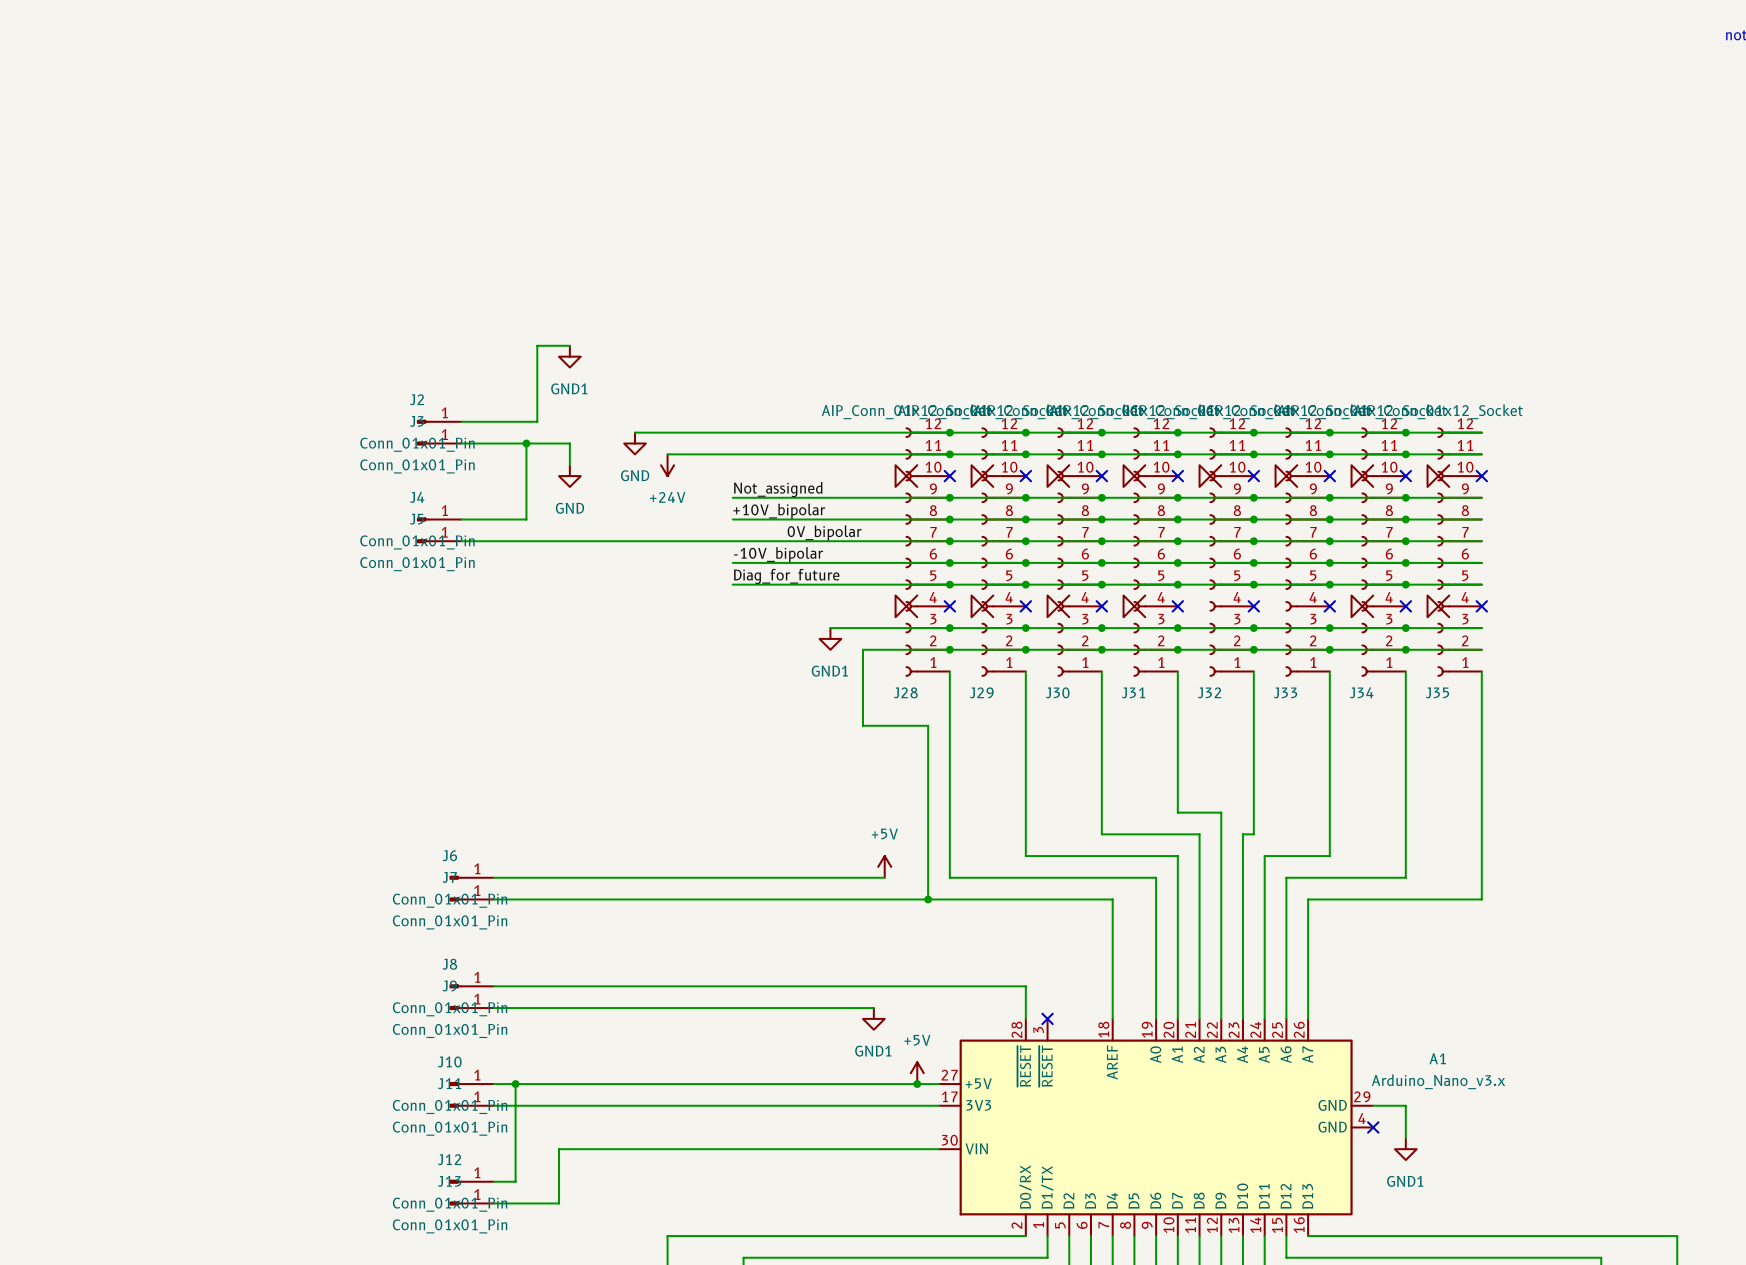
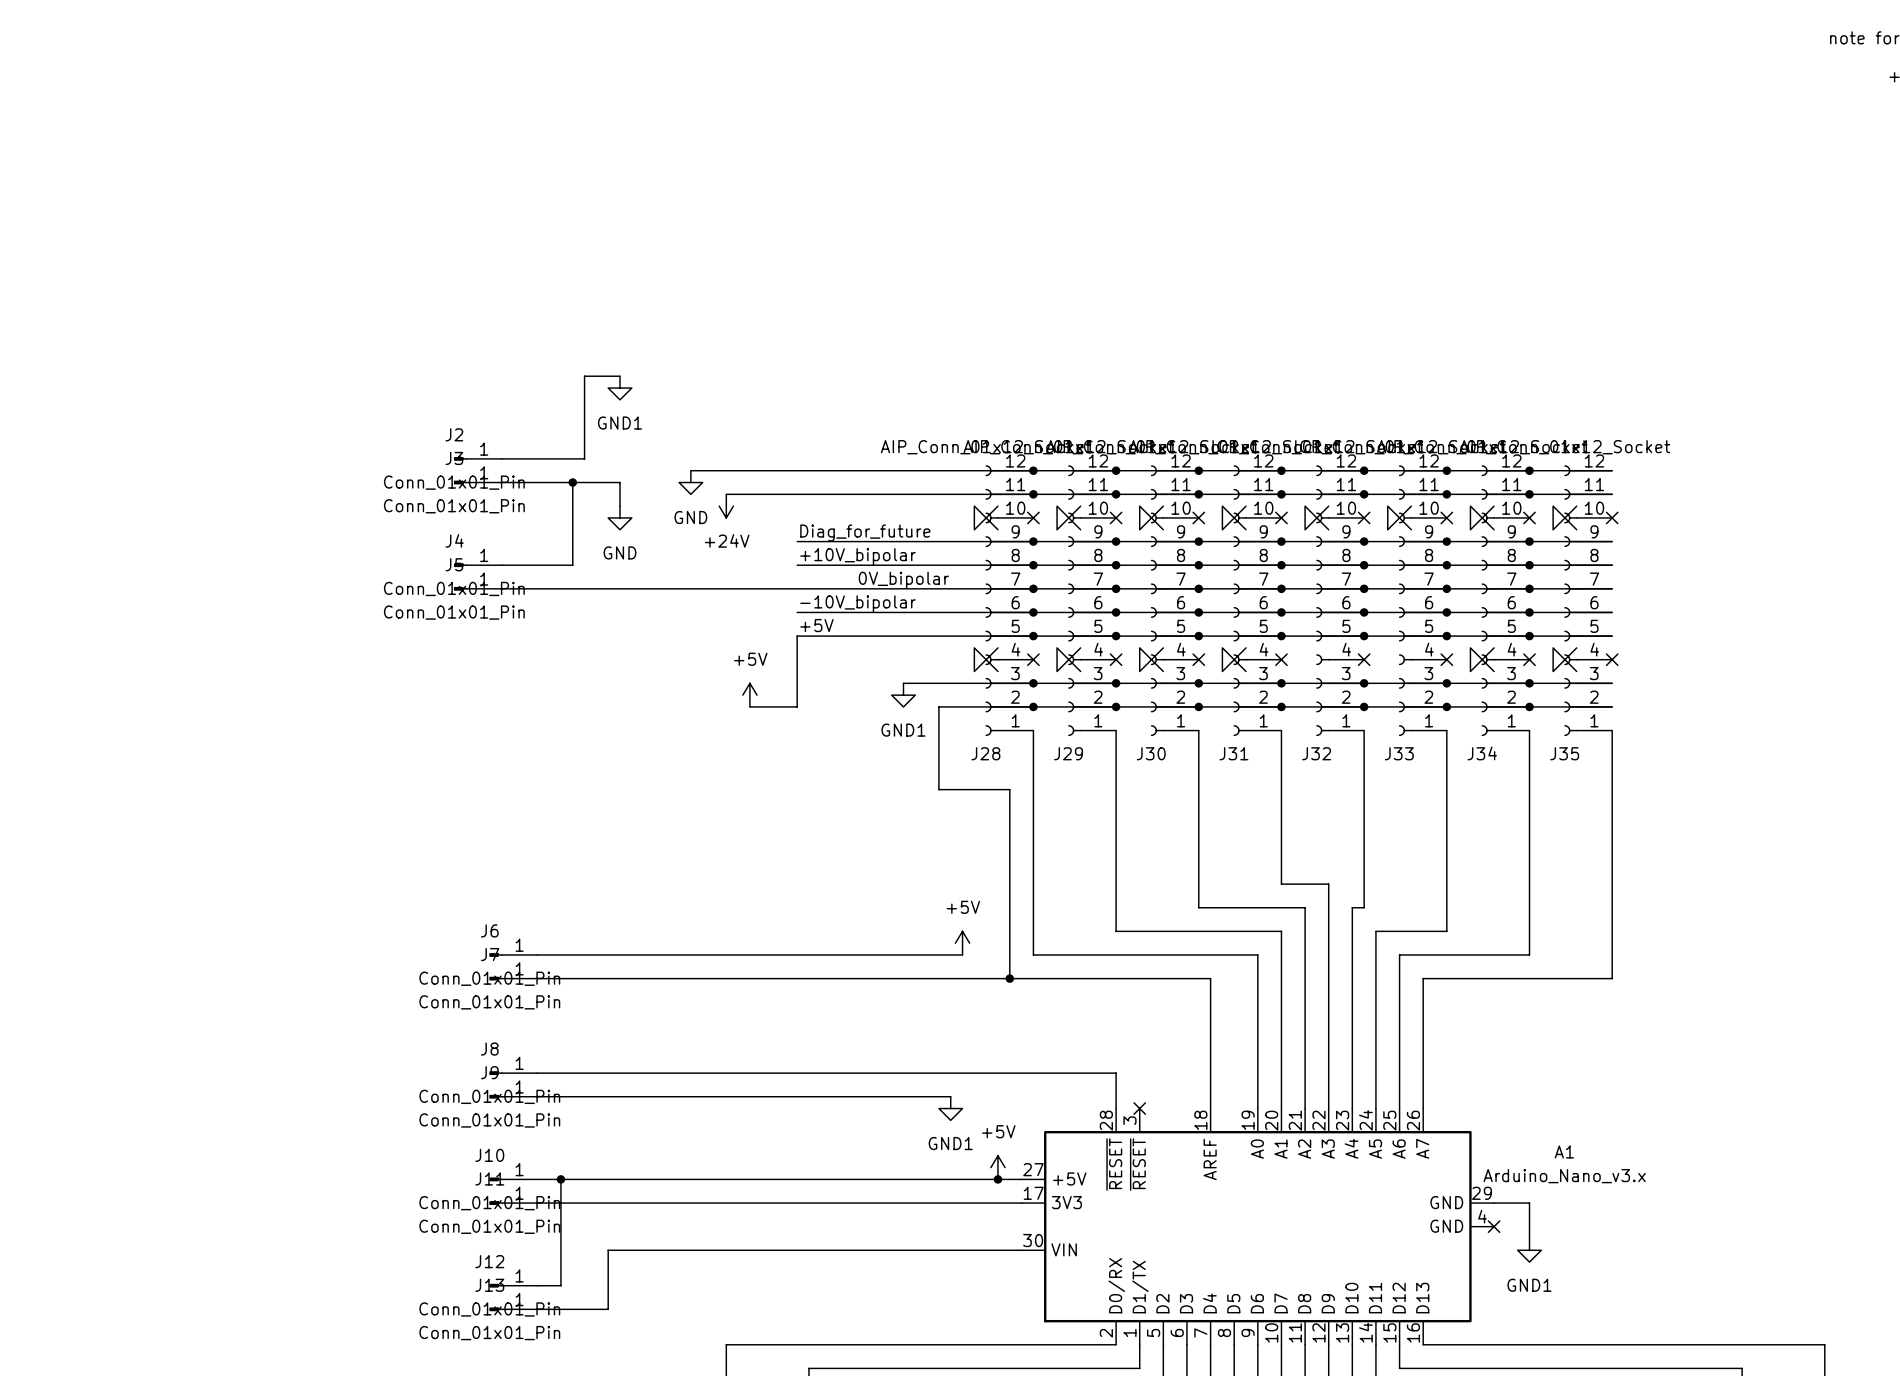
label: Not_assigned (778, 489) -> Diag_for_future (865, 533)
label: Diag_for_future (786, 576) -> +5V (816, 625)
wire: none -> (797, 636) (797, 706) (749, 706)
power symbol: none -> +5V (749, 695)

